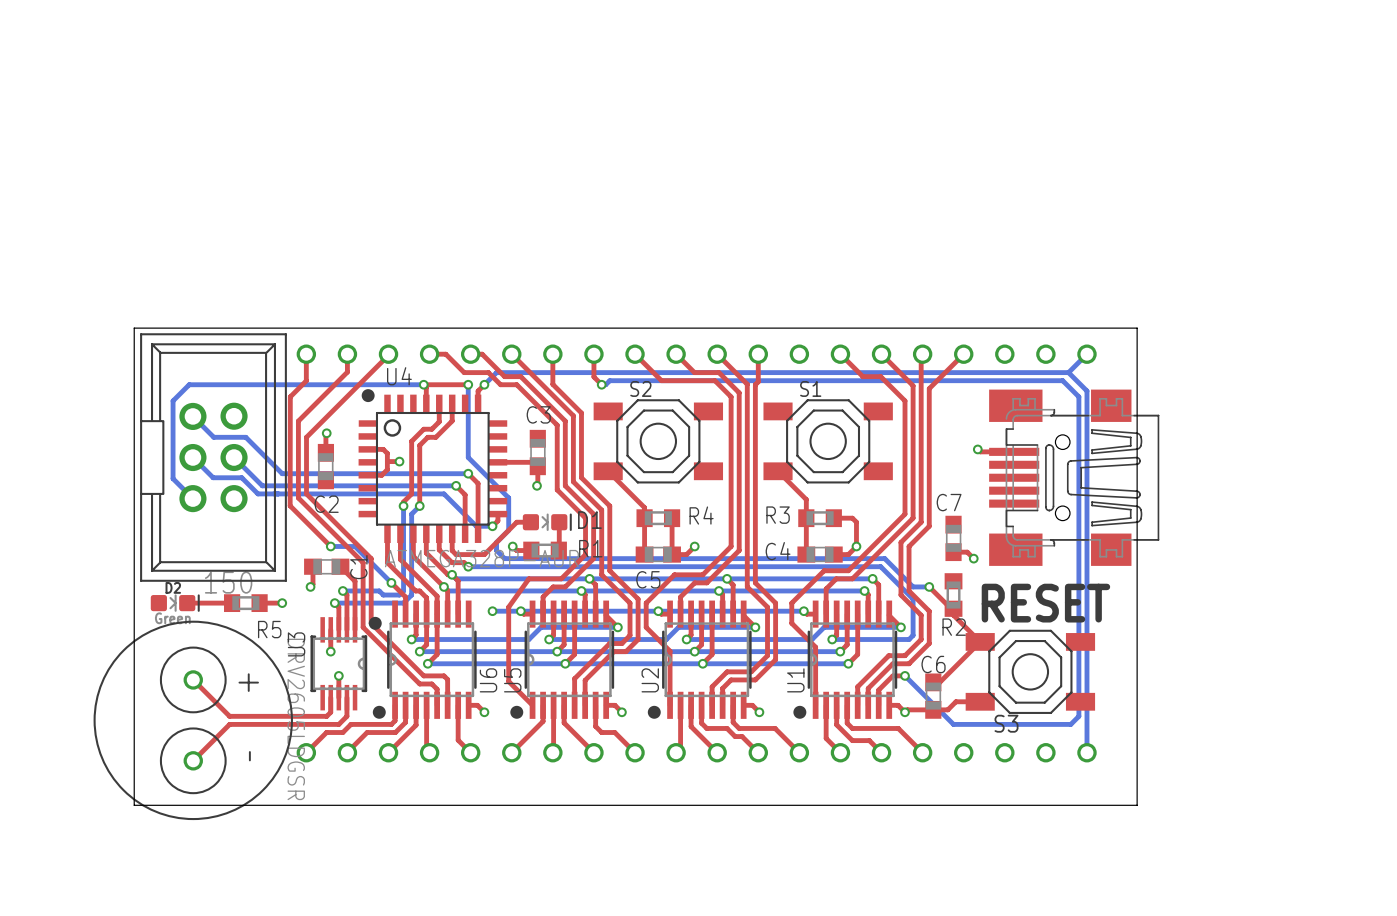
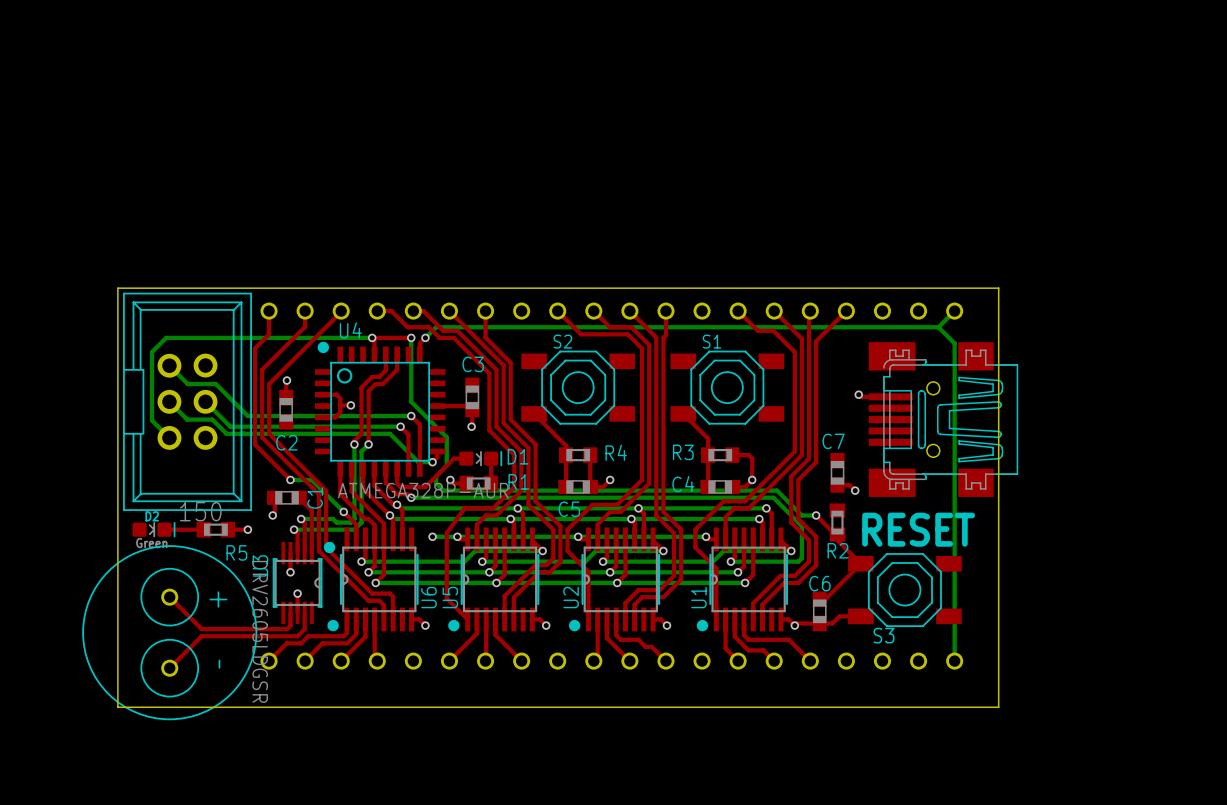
top track: (593, 354) (593, 376) (601, 384) -> none
bottom track: (601, 384) (605, 384) (609, 380) (1062, 380) (1078, 396) (1078, 716) (1070, 724) (953, 724) (905, 675) -> none
via: (601, 384) -> none
top track: (905, 675) (892, 675) (878, 690) (878, 705) -> none
via: (905, 675) -> none
top track: (458, 705) (458, 740) (470, 752) -> none
top track: (595, 705) (595, 726) (601, 732) (614, 732) (635, 752) -> none
top track: (733, 705) (733, 722) (739, 728) (775, 728) (799, 752) -> none

